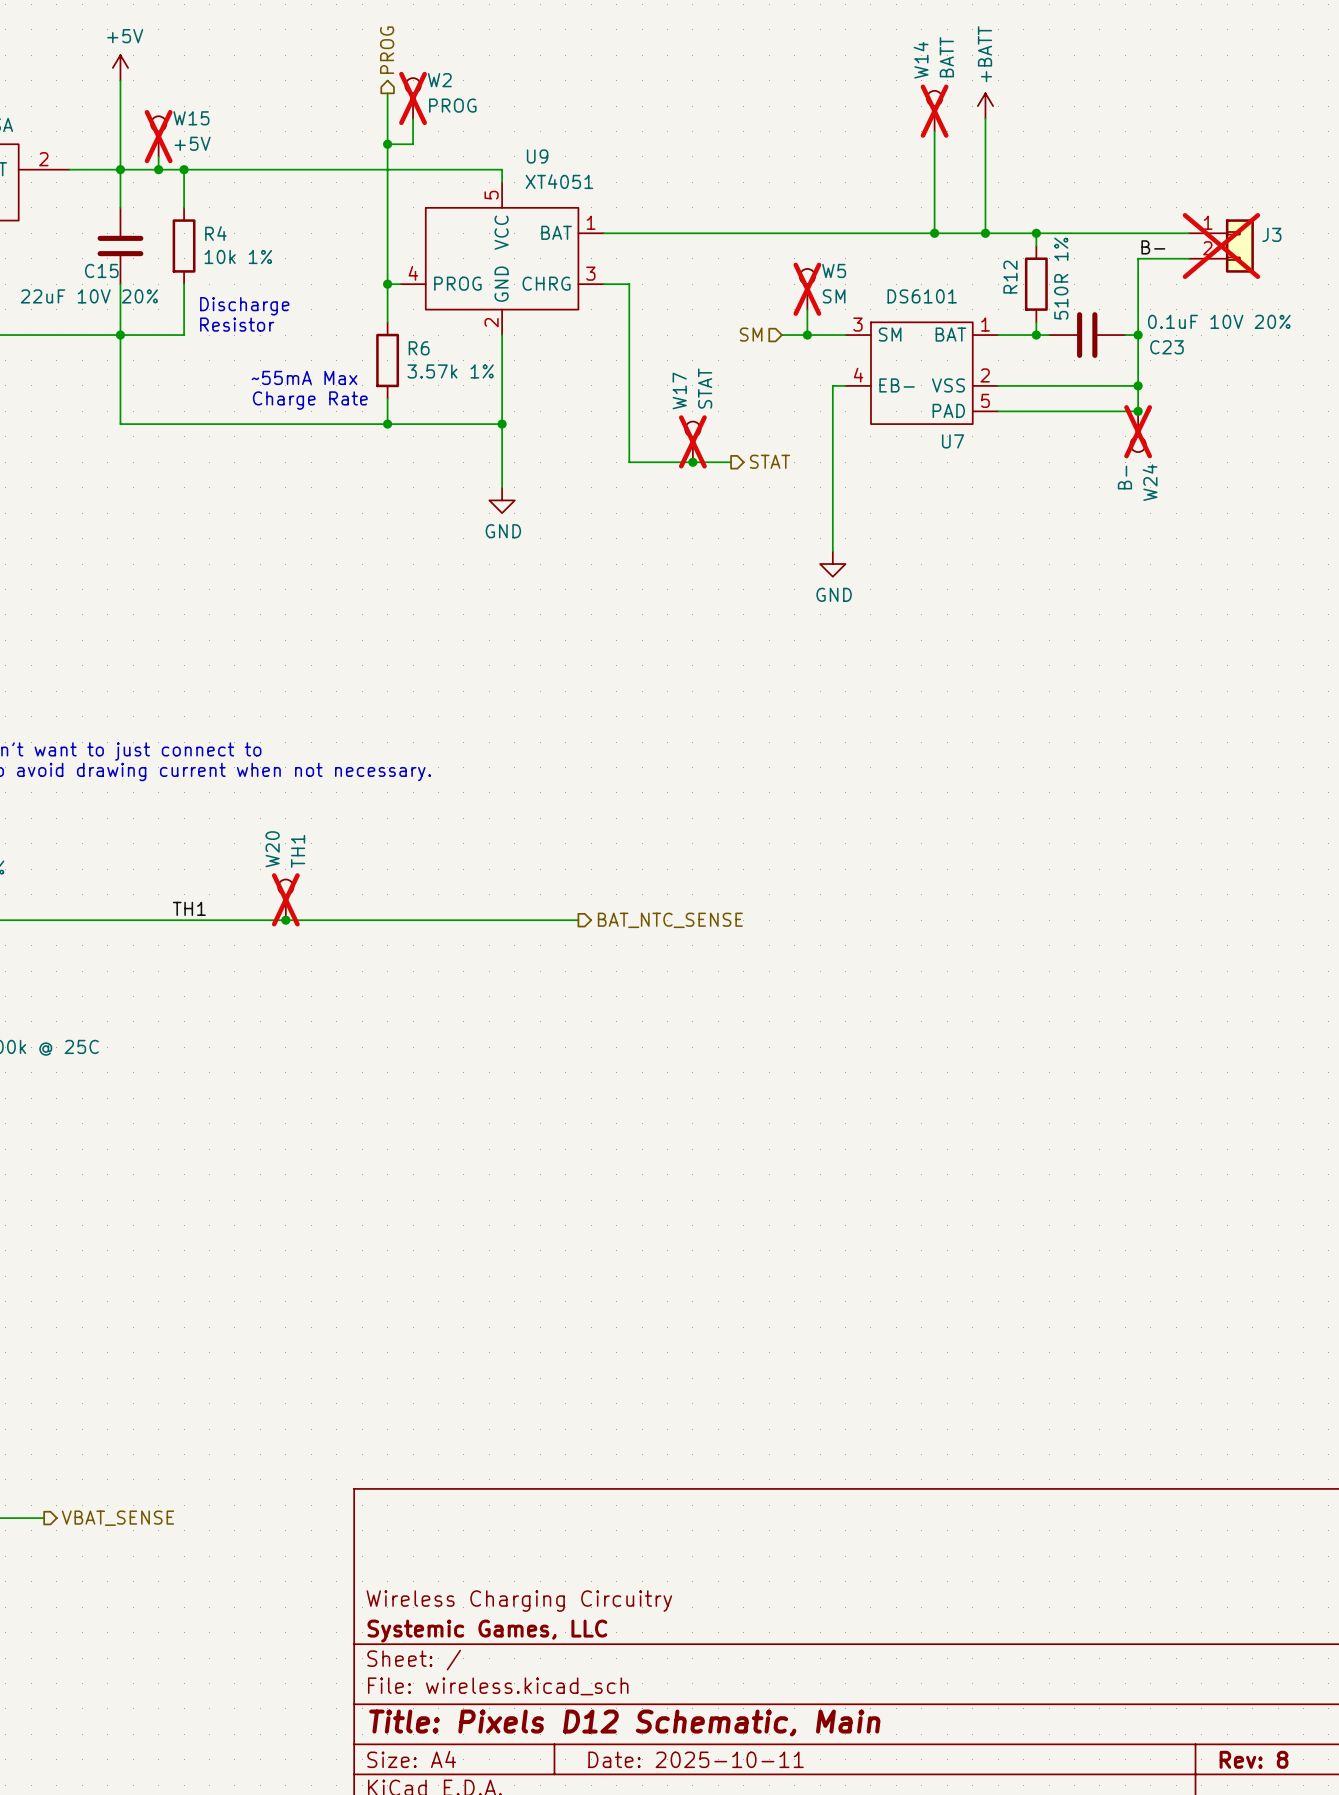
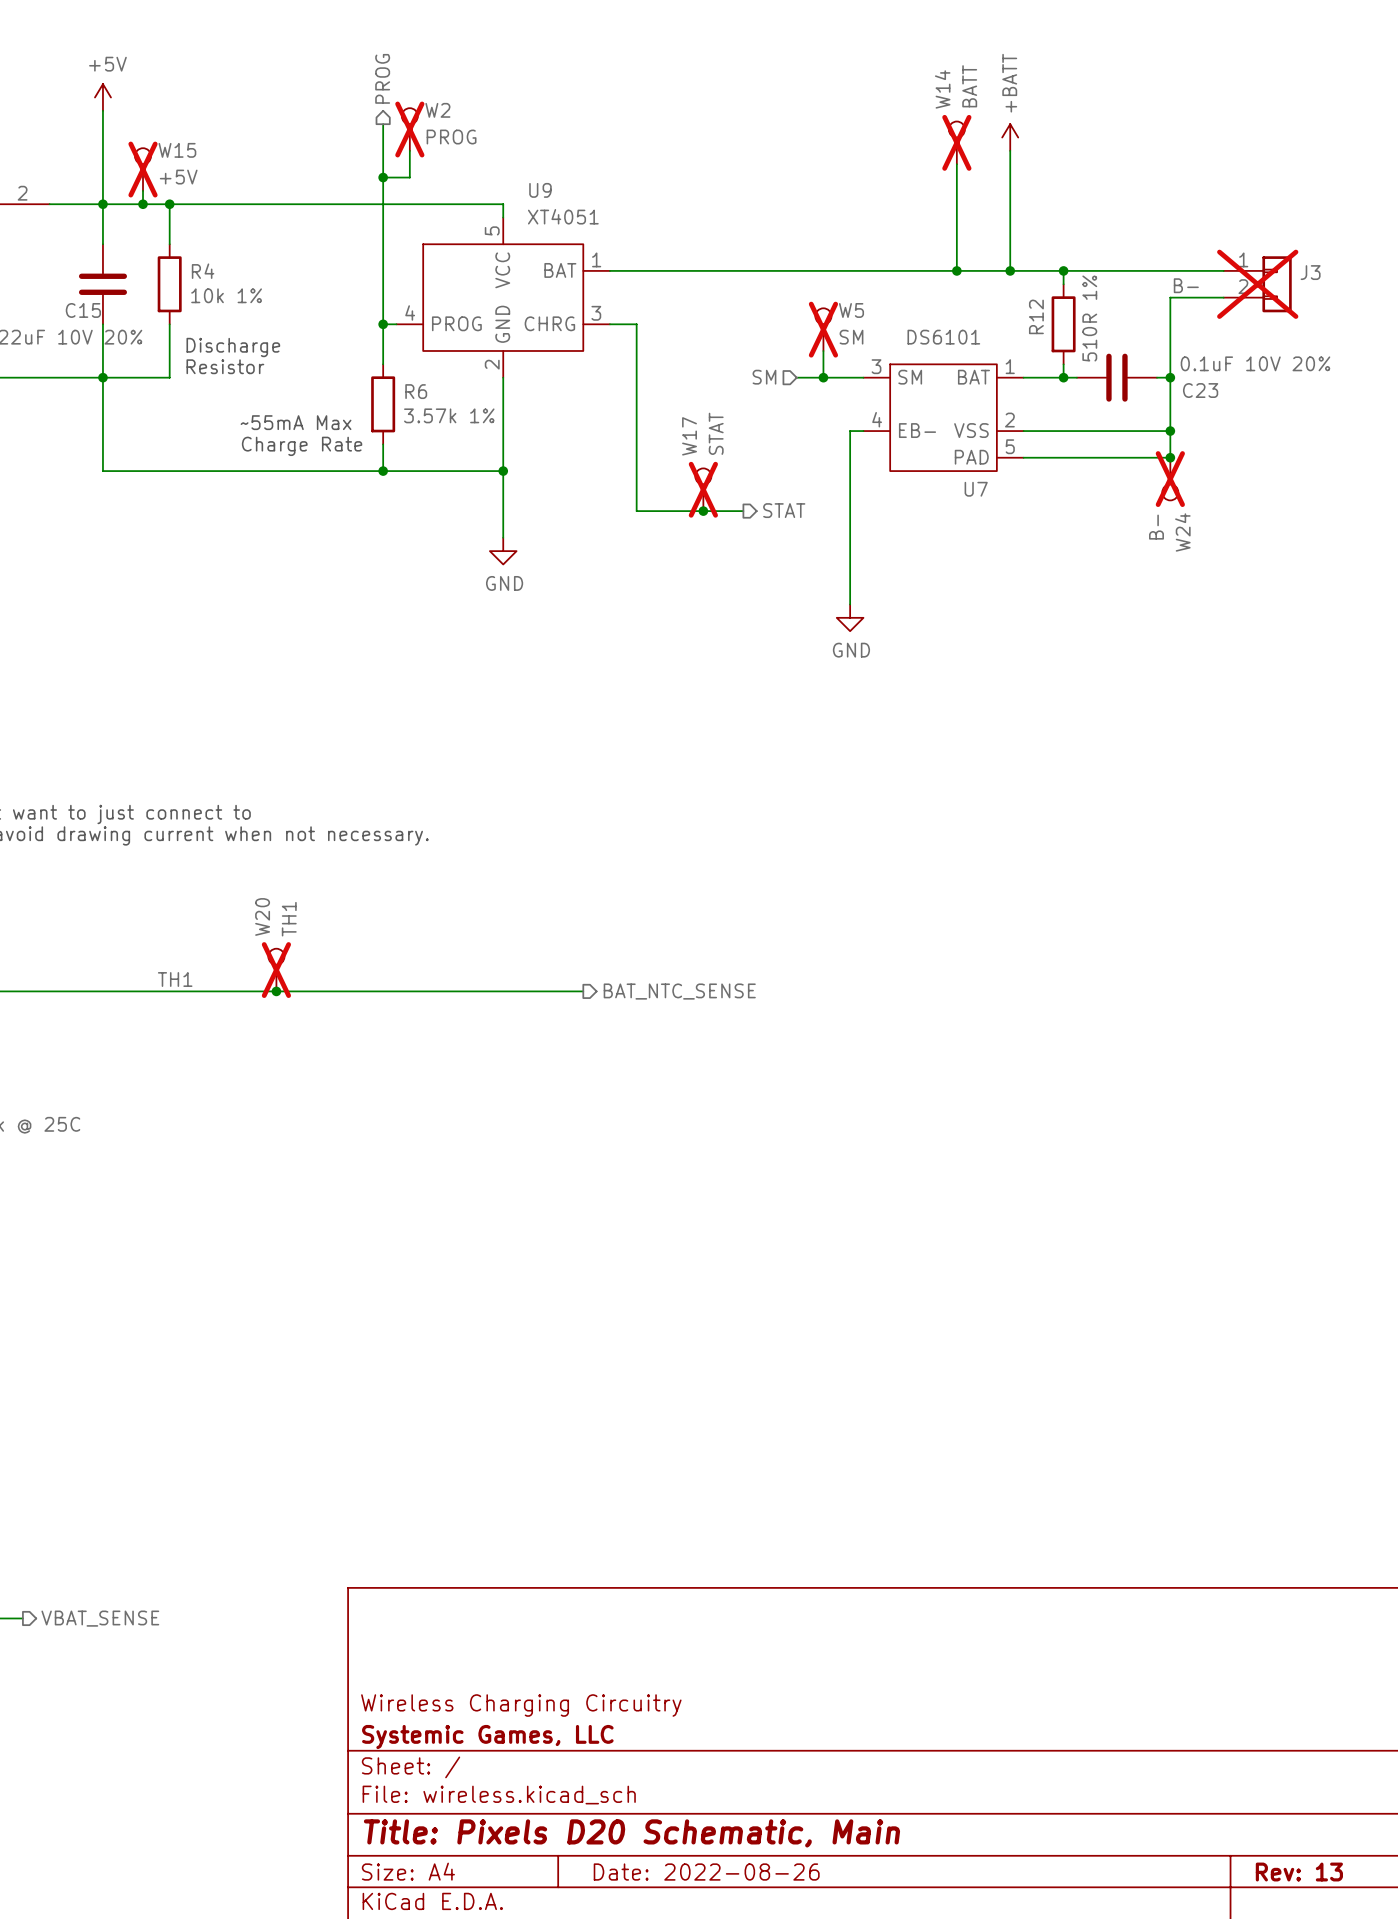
title block: Title: Pixels D12 Schematic, Main (624, 1722) -> Title: Pixels D20 Schematic, Main (631, 1833)
title block: Date: 2025-10-11 (696, 1759) -> Date: 2022-08-26 (706, 1872)
title block: Rev: 8 (1254, 1759) -> Rev: 13 (1299, 1872)

